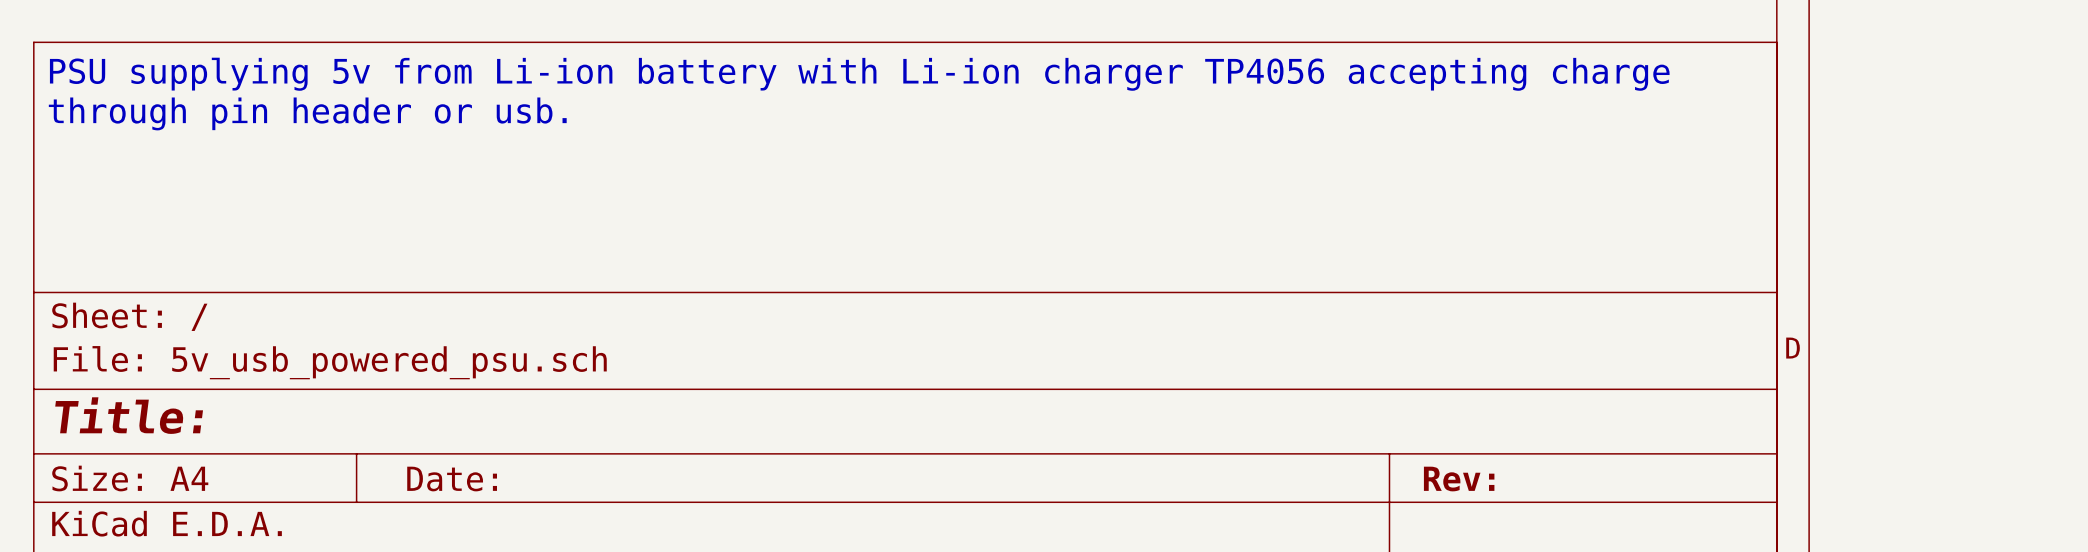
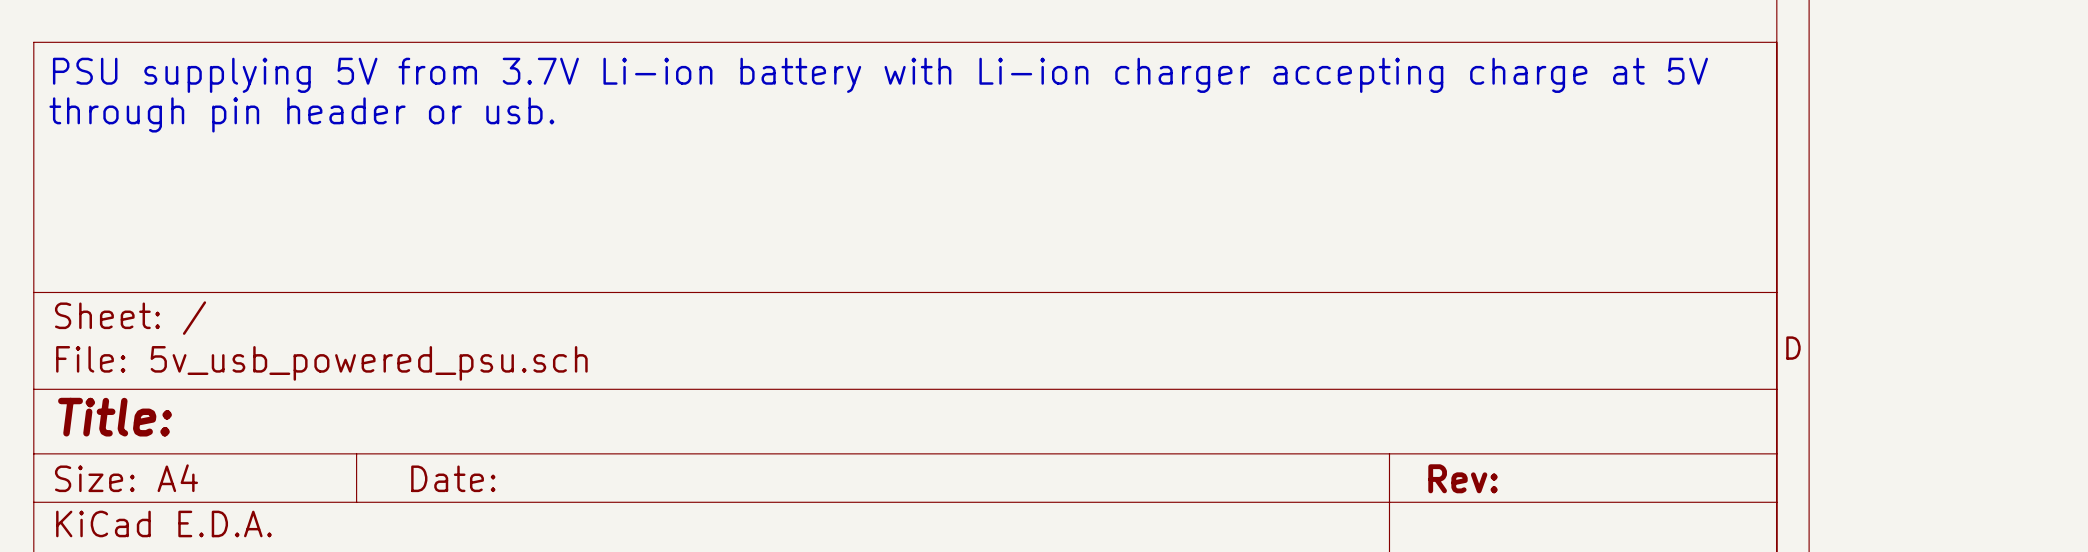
text: PSU supplying 5v from Li-ion battery with Li-ion charger TP4056 accepting charge (859, 74) -> PSU supplying 5V from 3.7V Li-ion battery with Li-ion charger accepting charge at 5V (880, 75)

